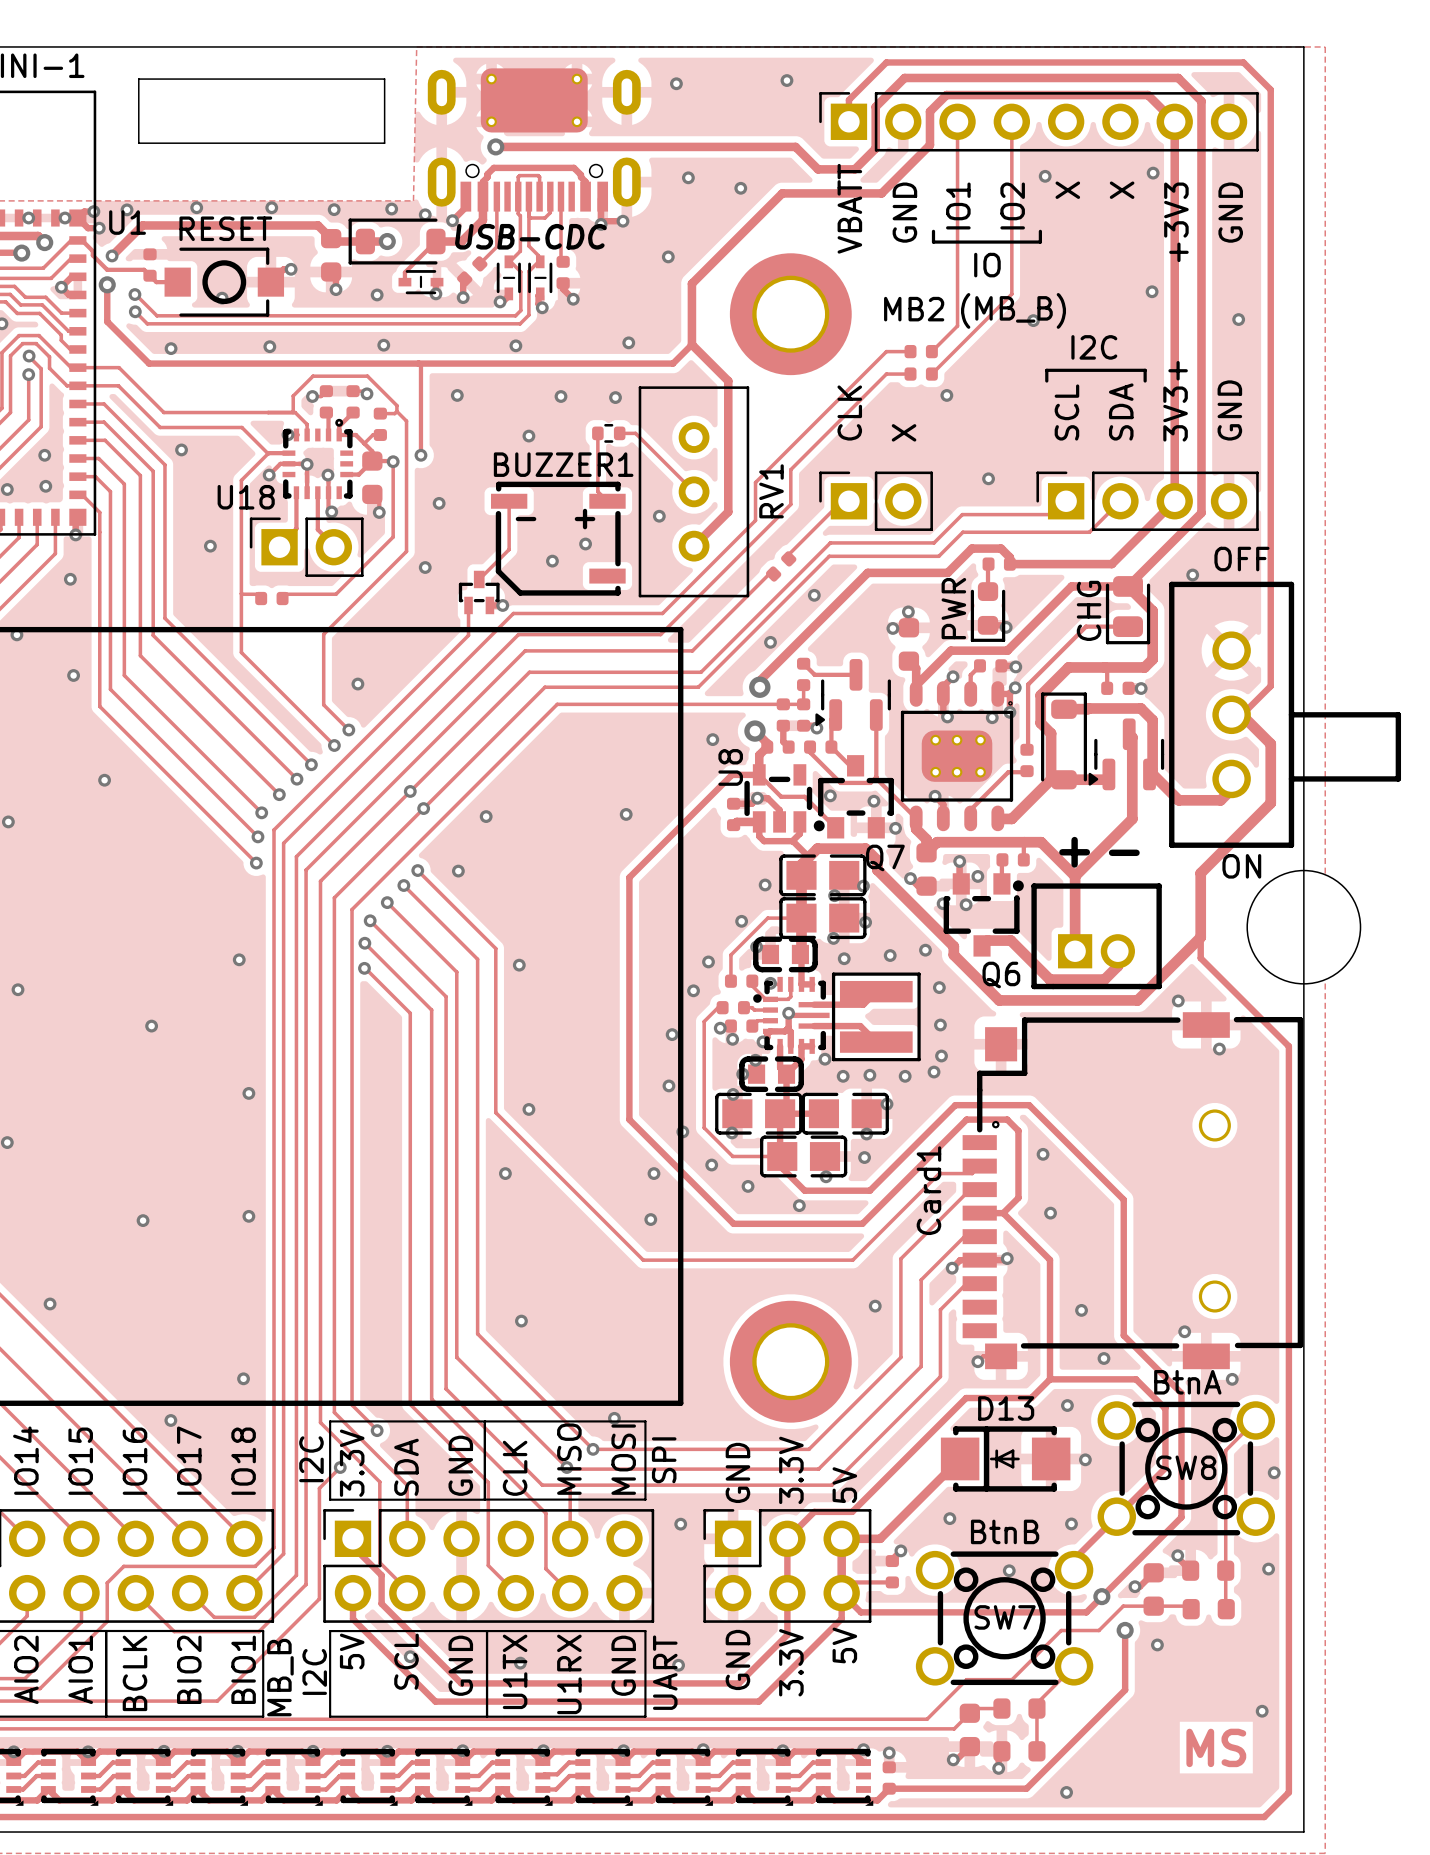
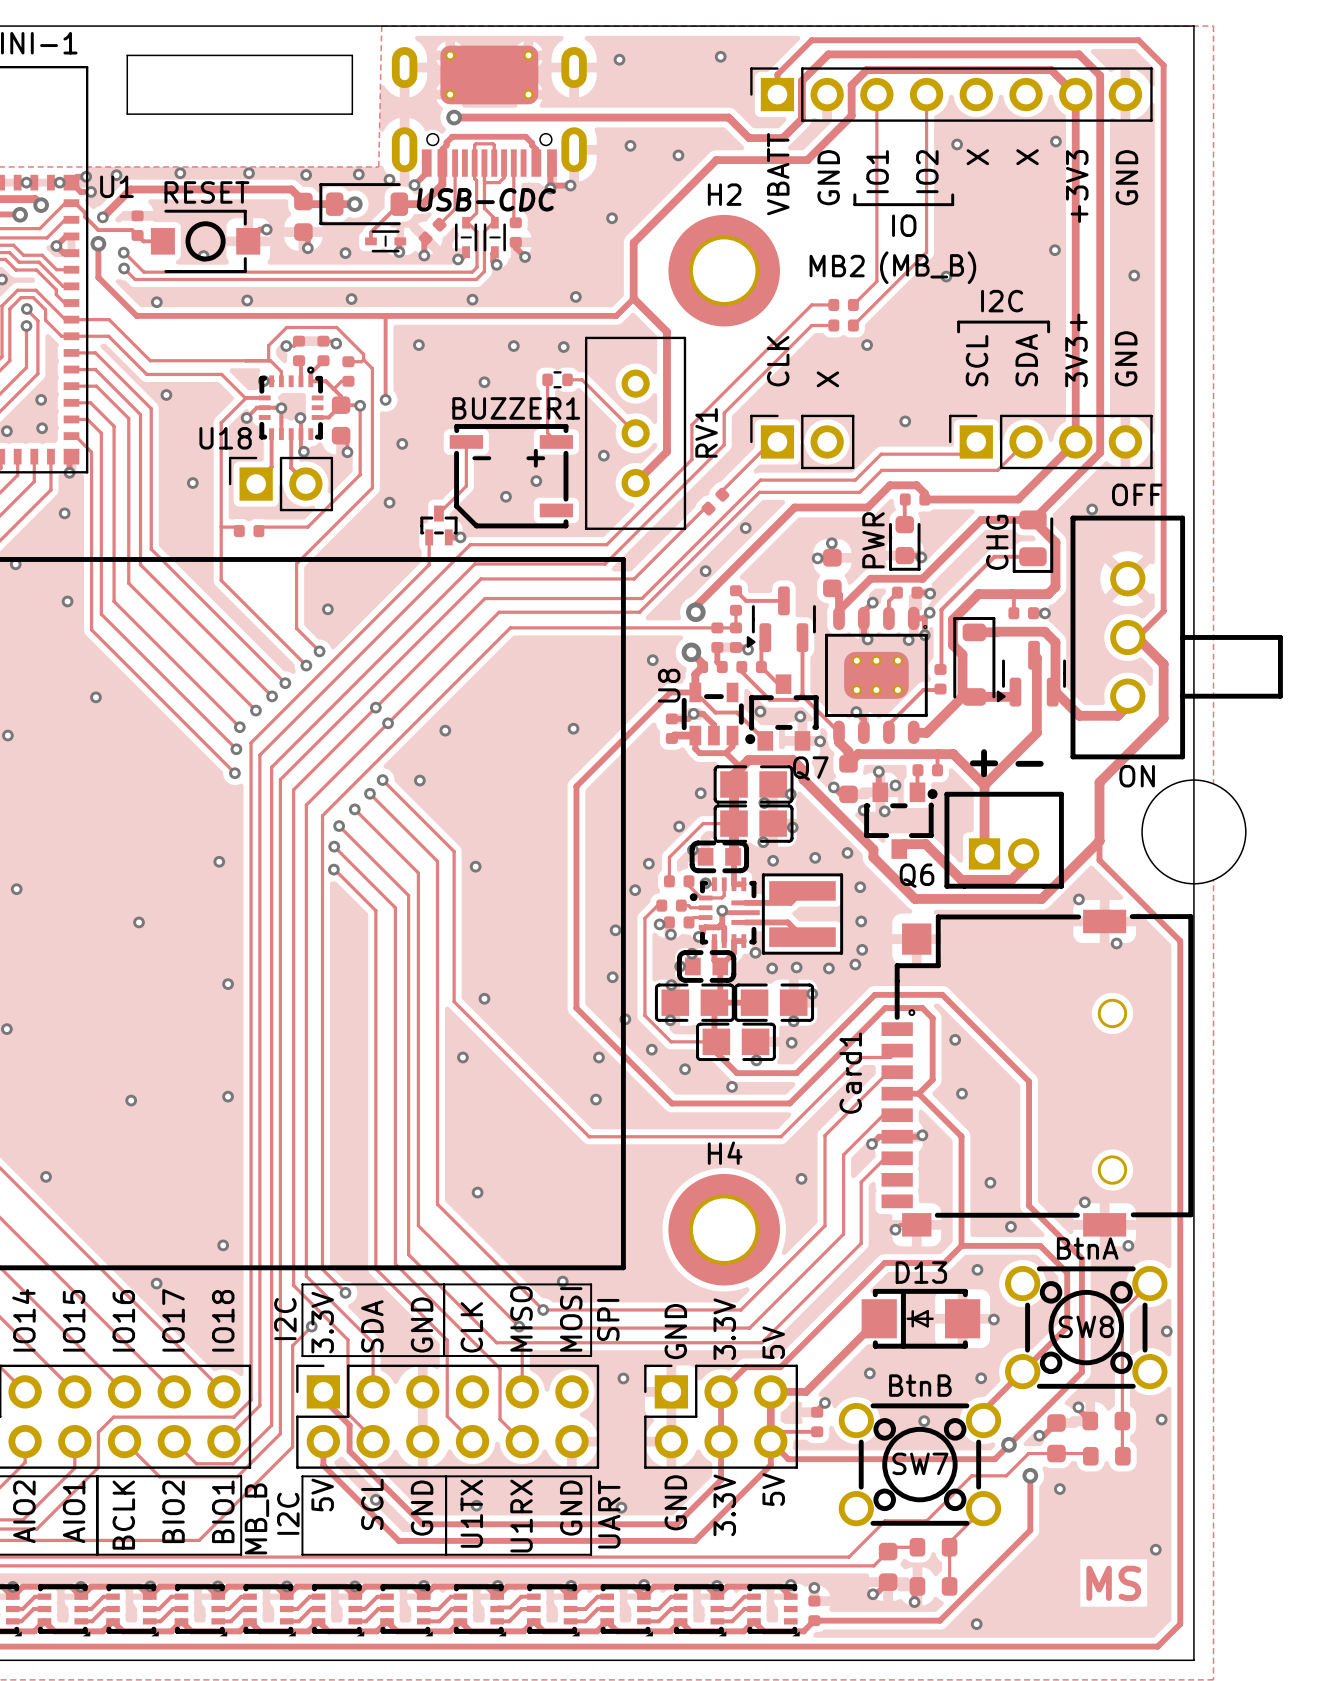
H2 name: none -> H2 (724, 194)
H4 name: none -> H4 (725, 1153)

